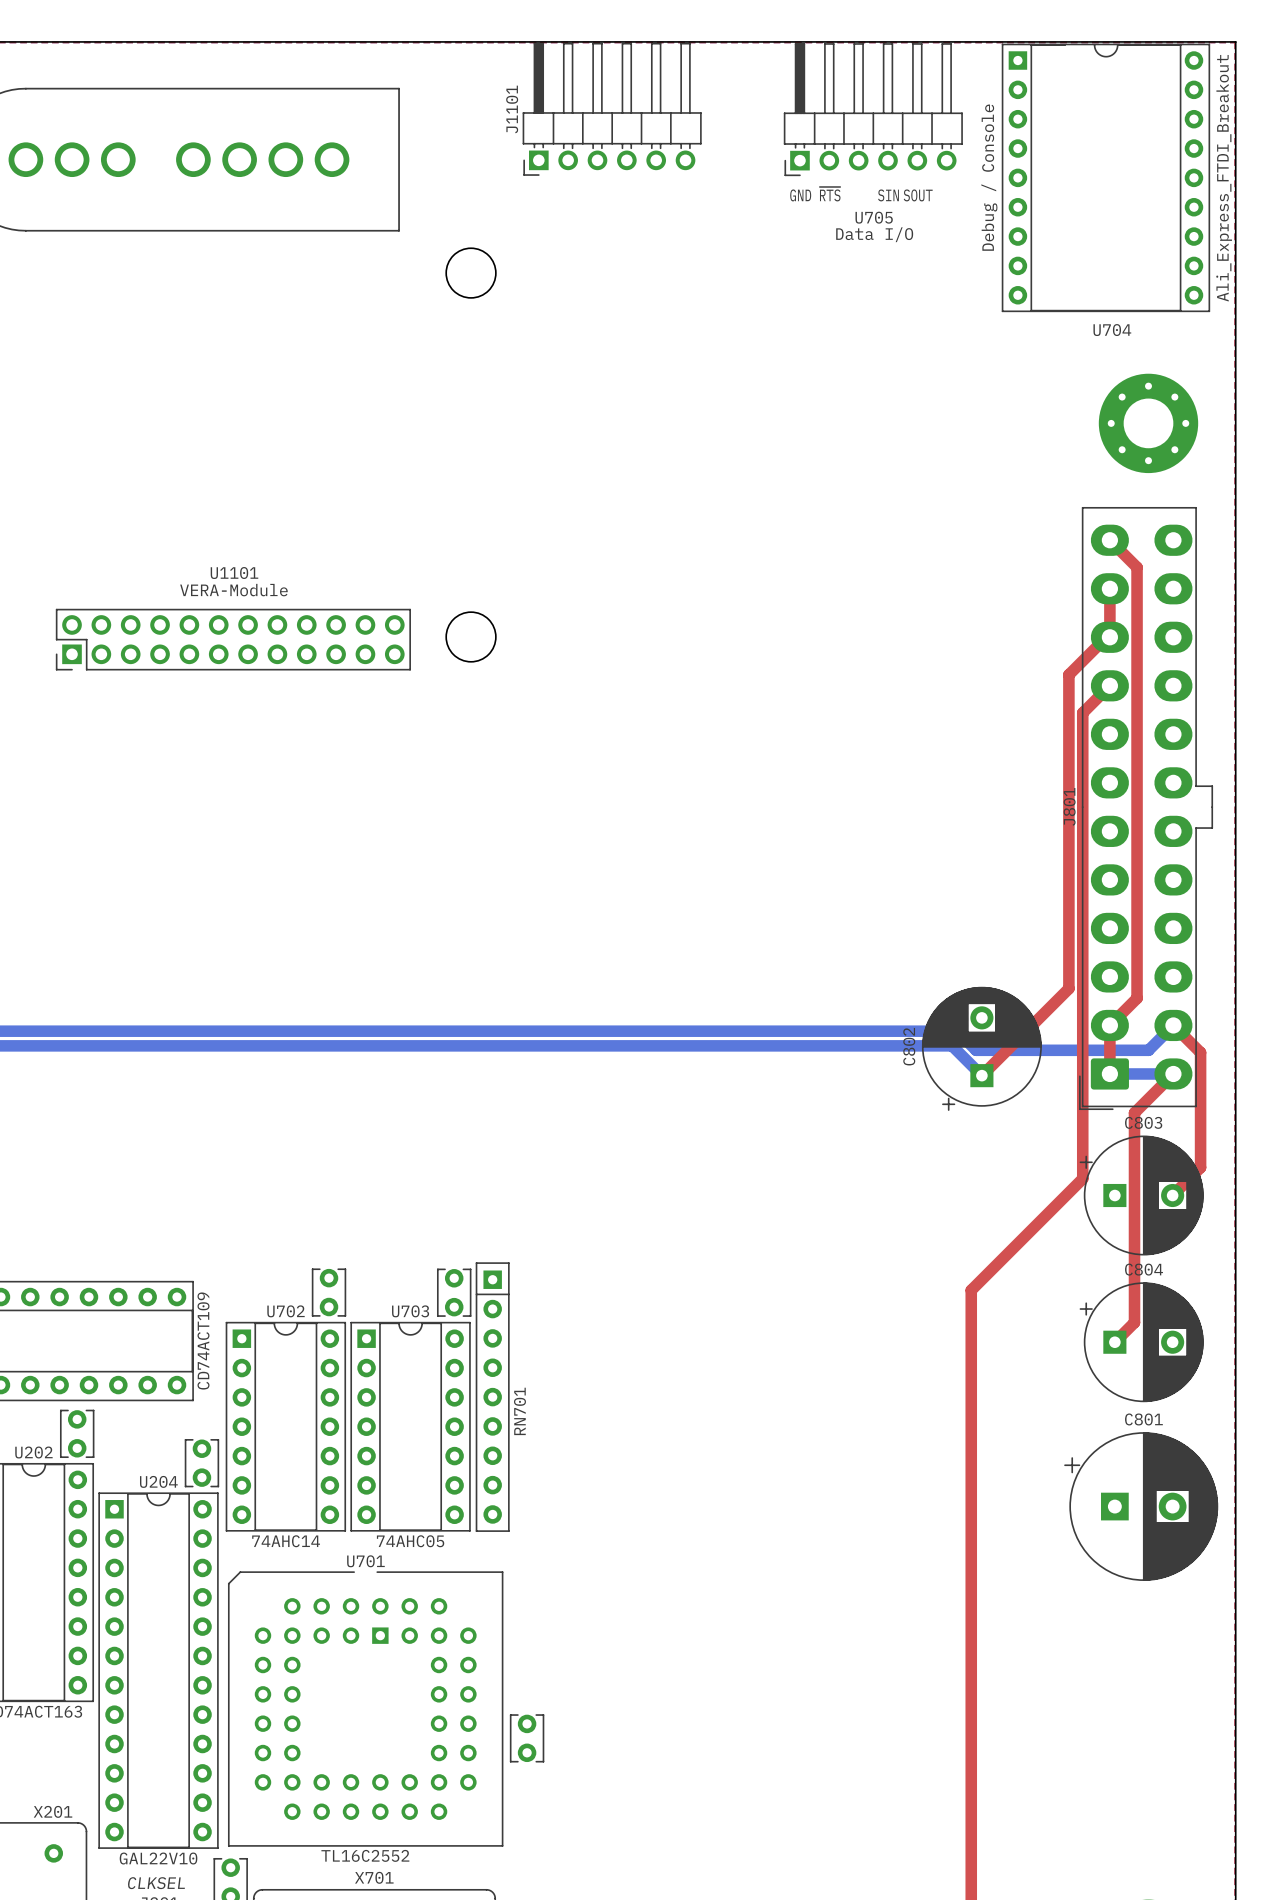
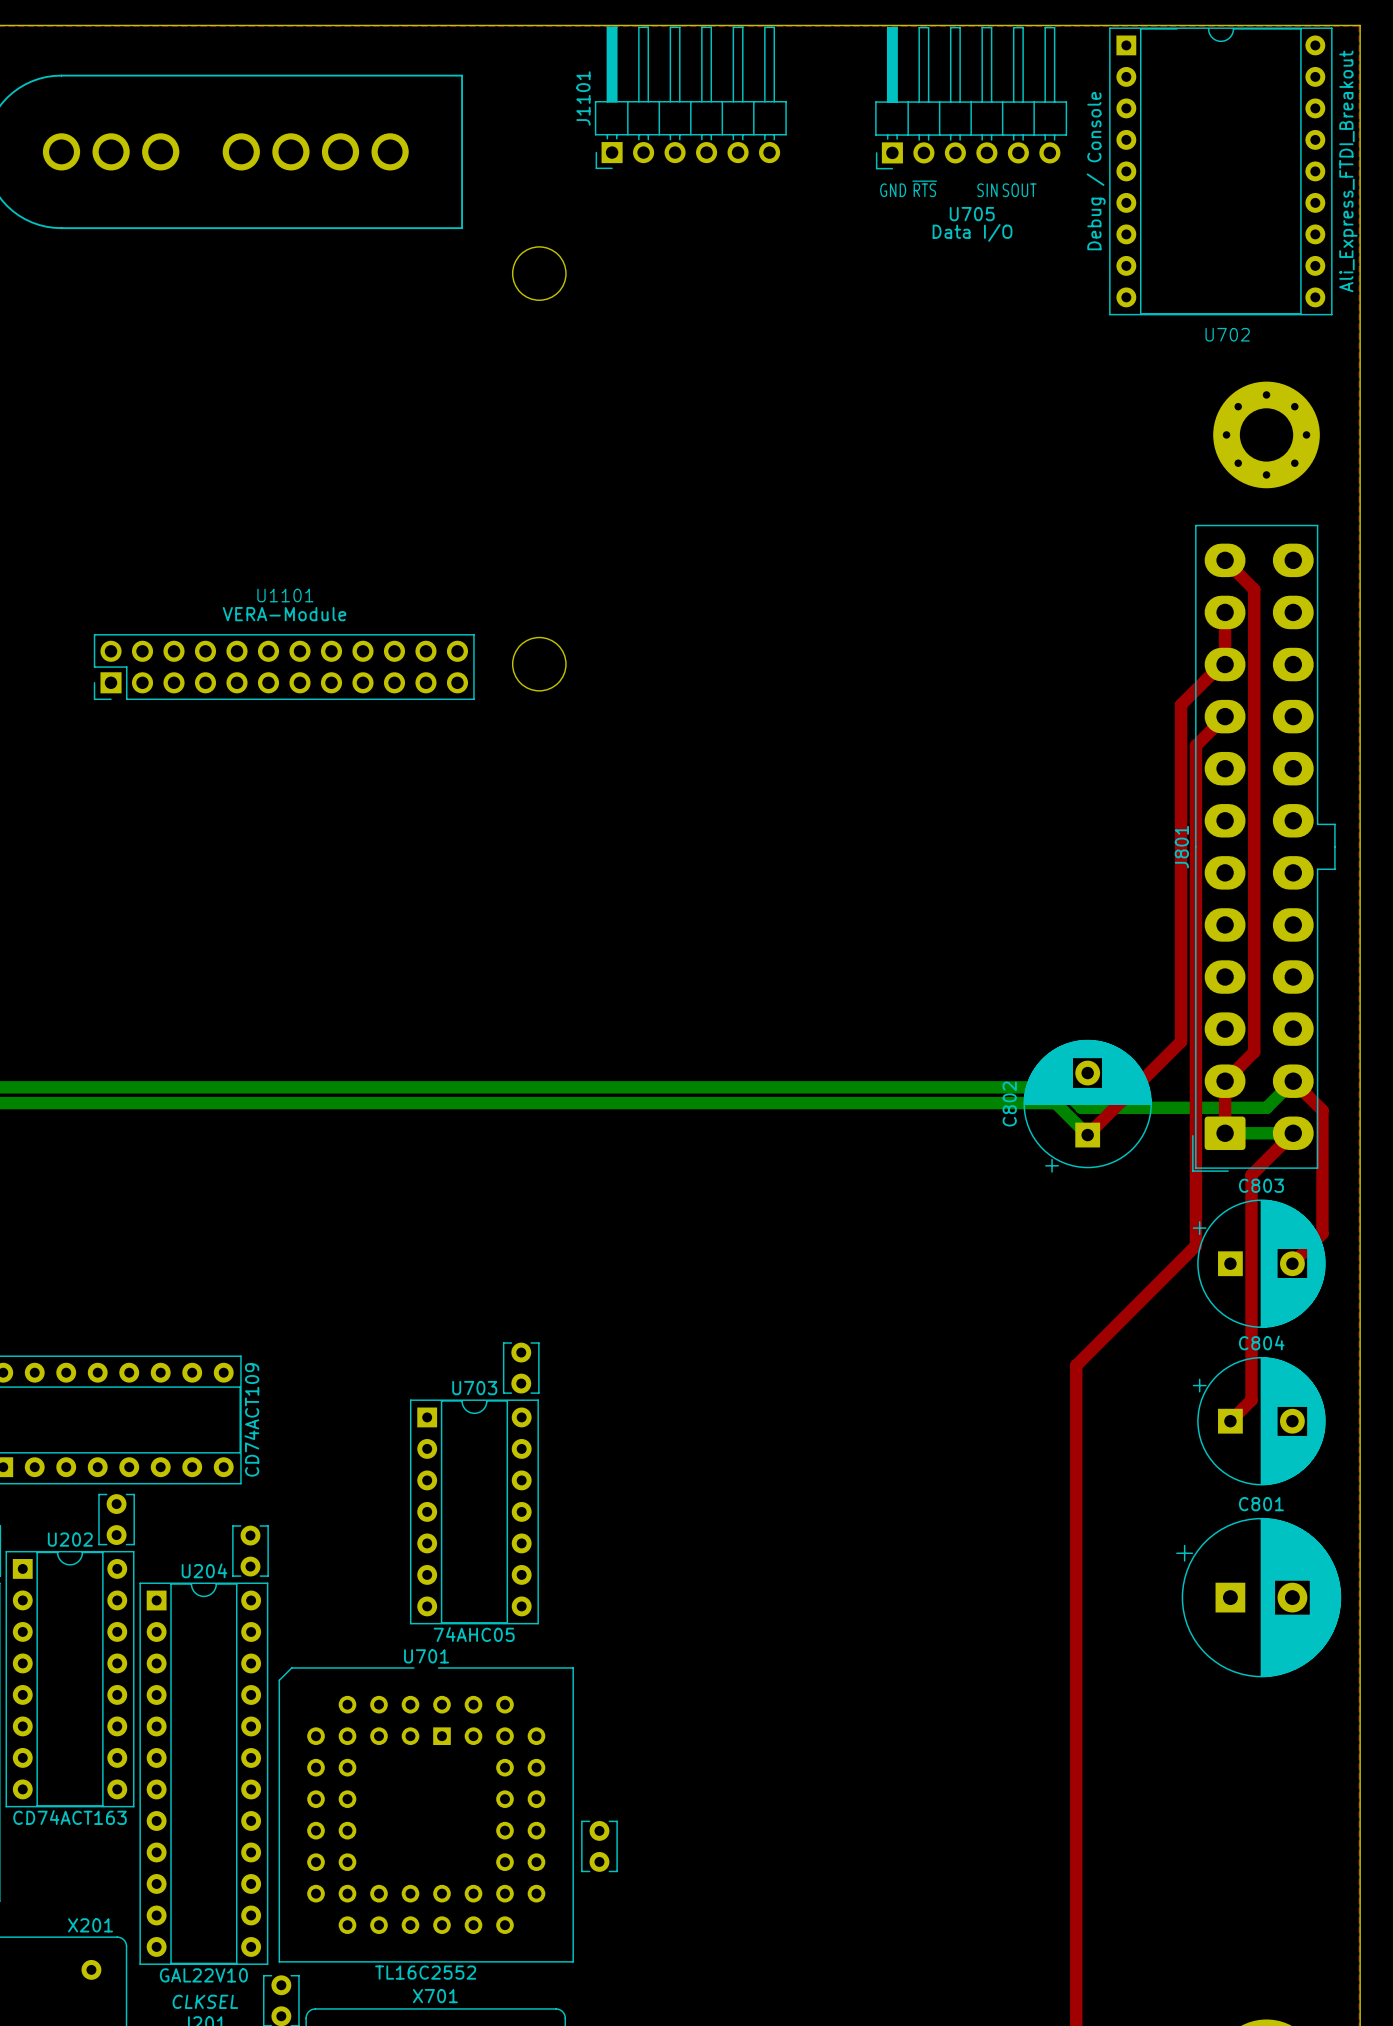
U704 name: U704 (1112, 330) -> U702 (1227, 334)
part: (329, 1292) -> none
RN701: (492, 1397) -> none
U702: 74AHC14 (285, 1426) -> none

